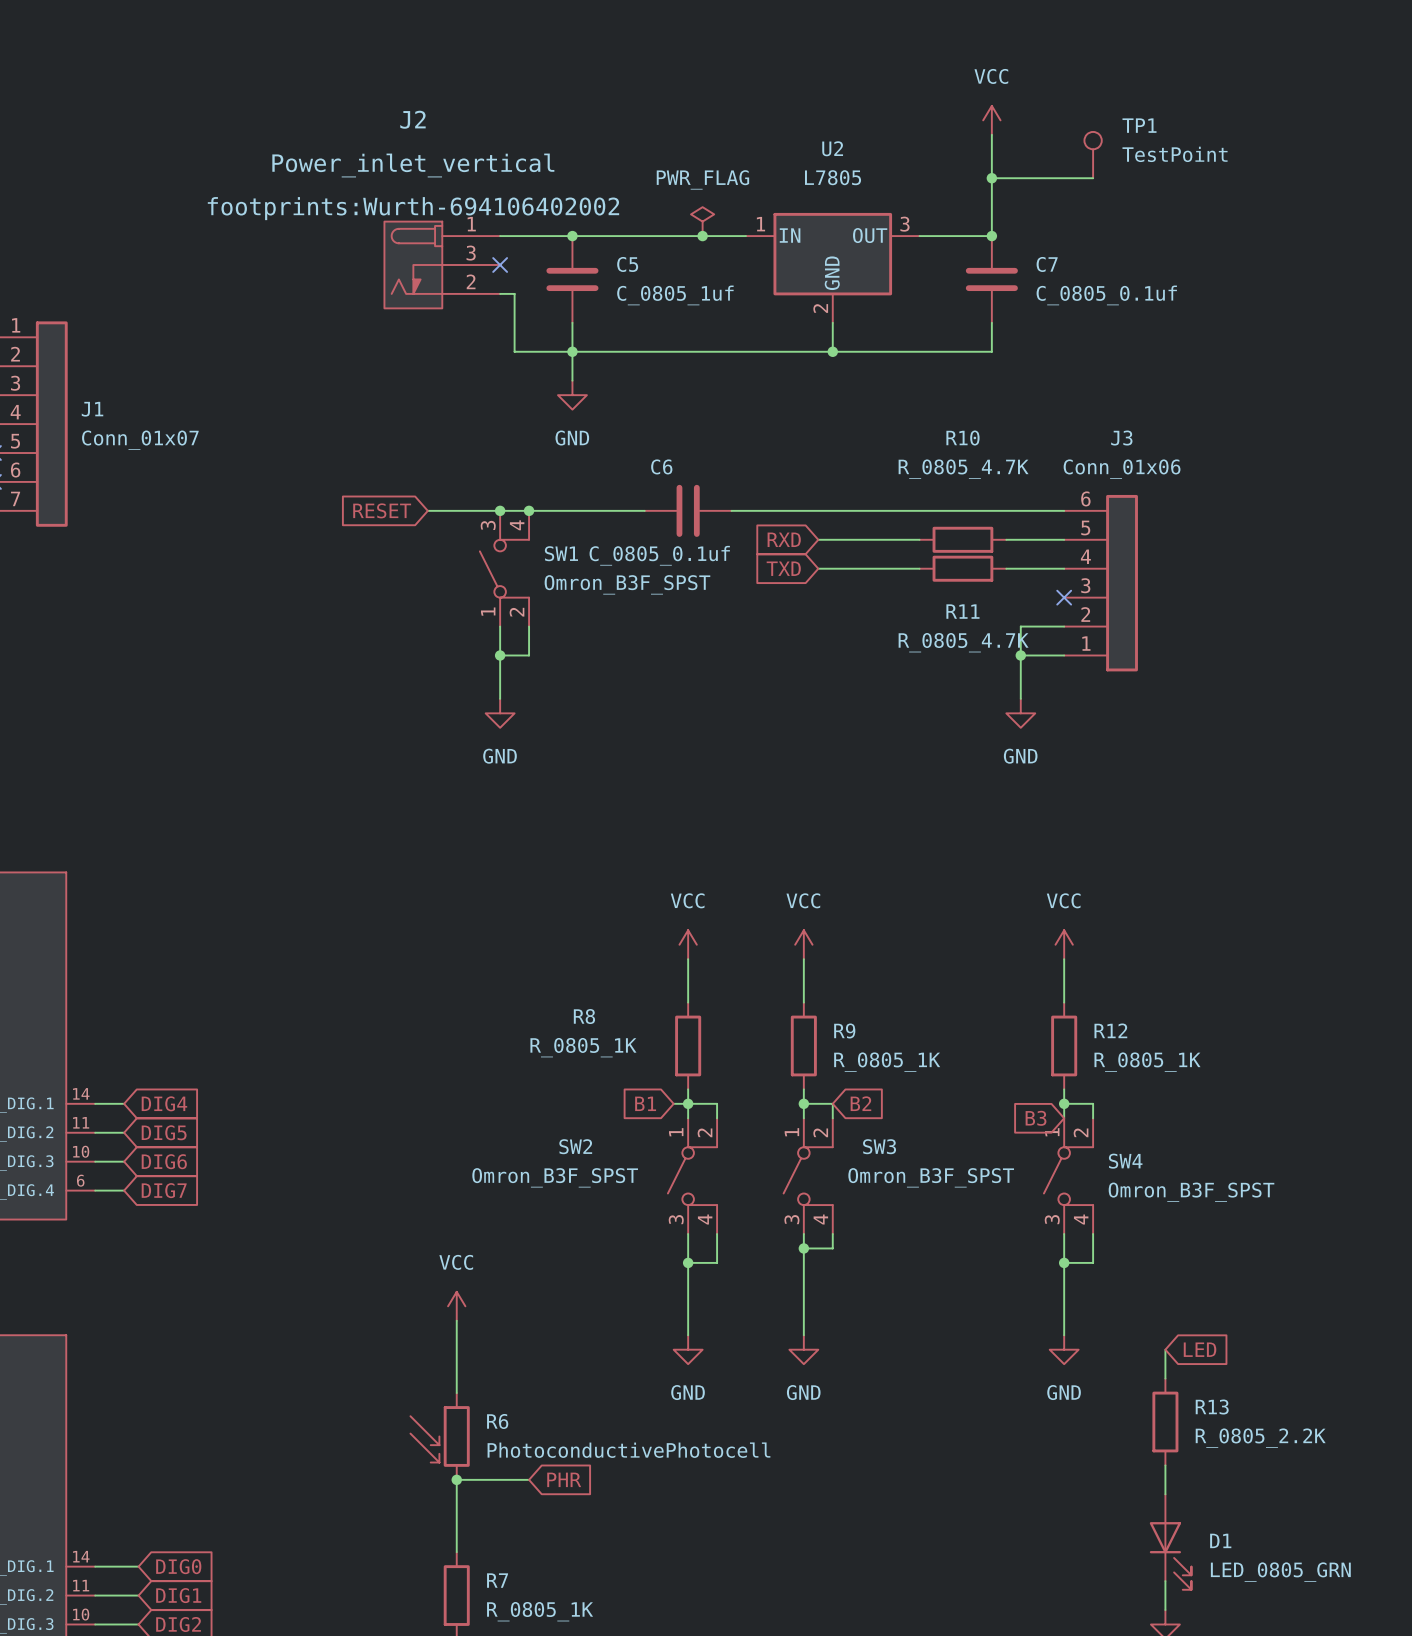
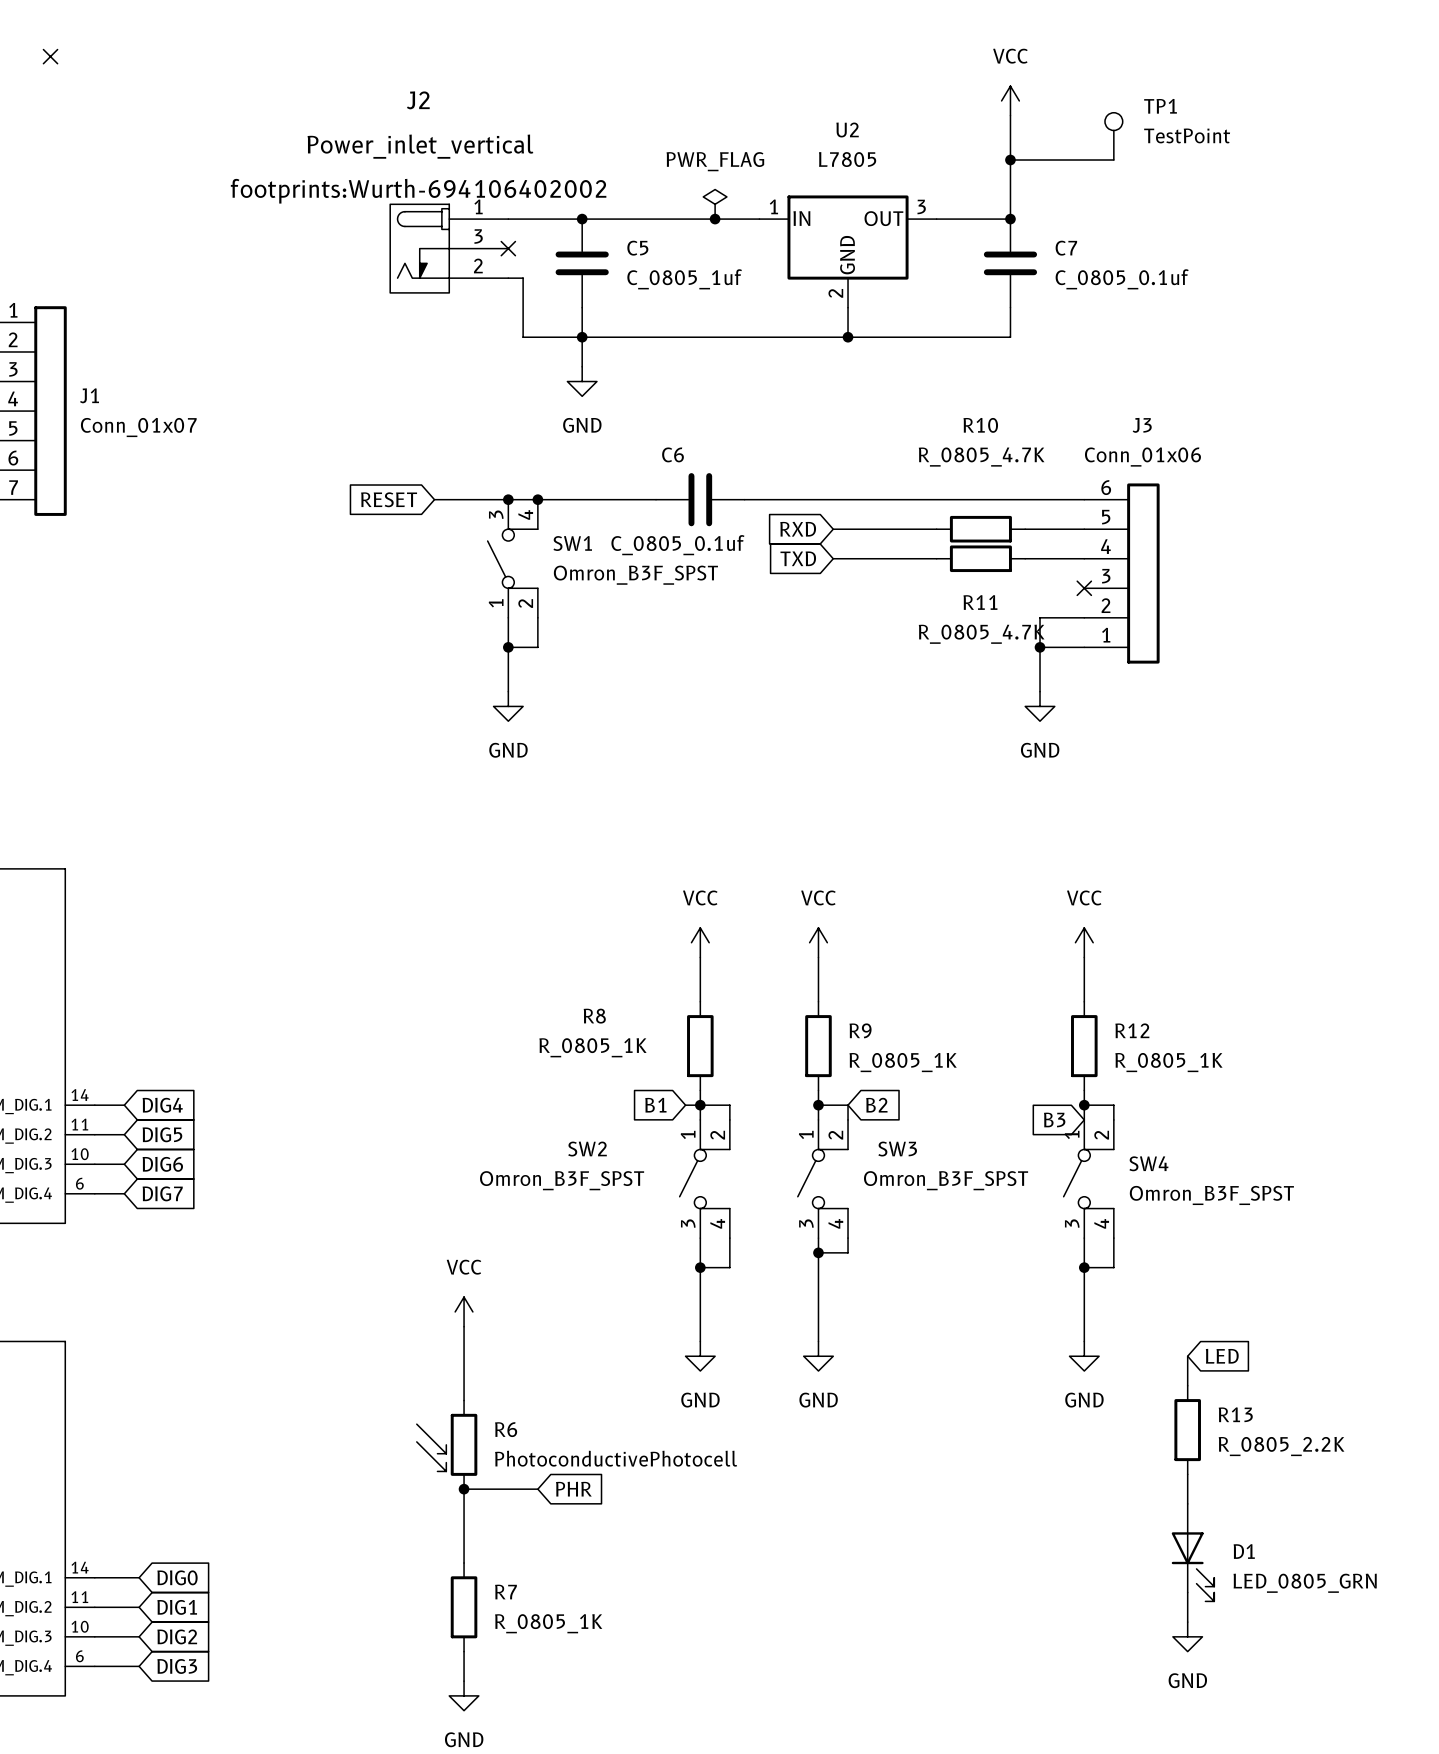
no-connect mark: none -> (50, 56)

